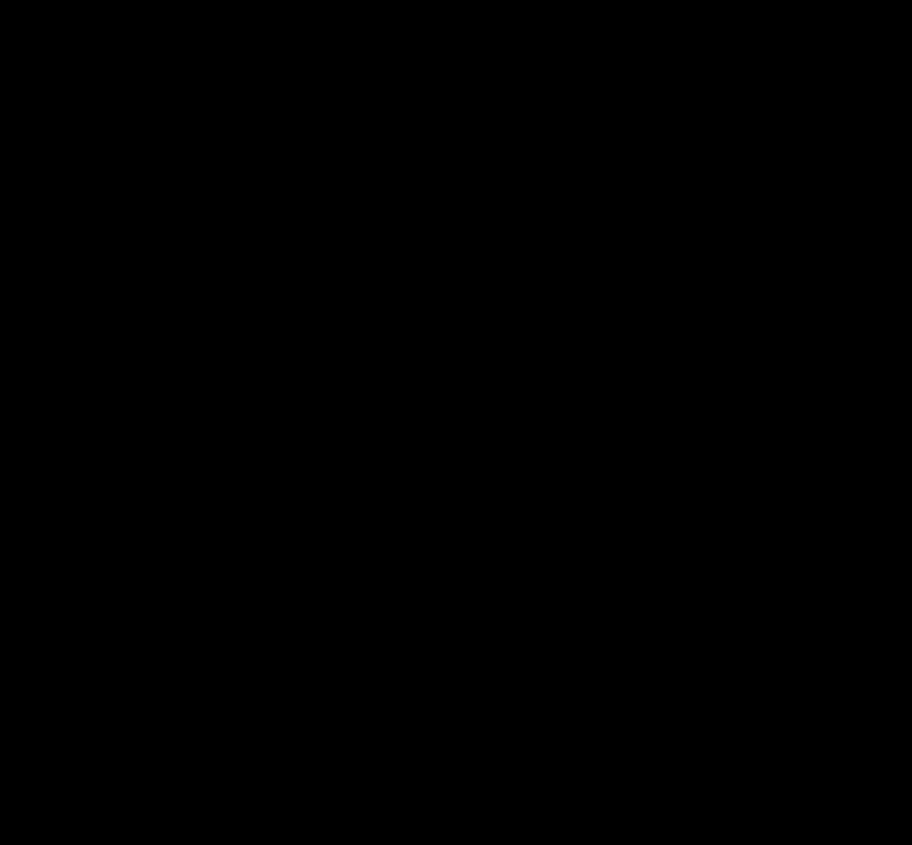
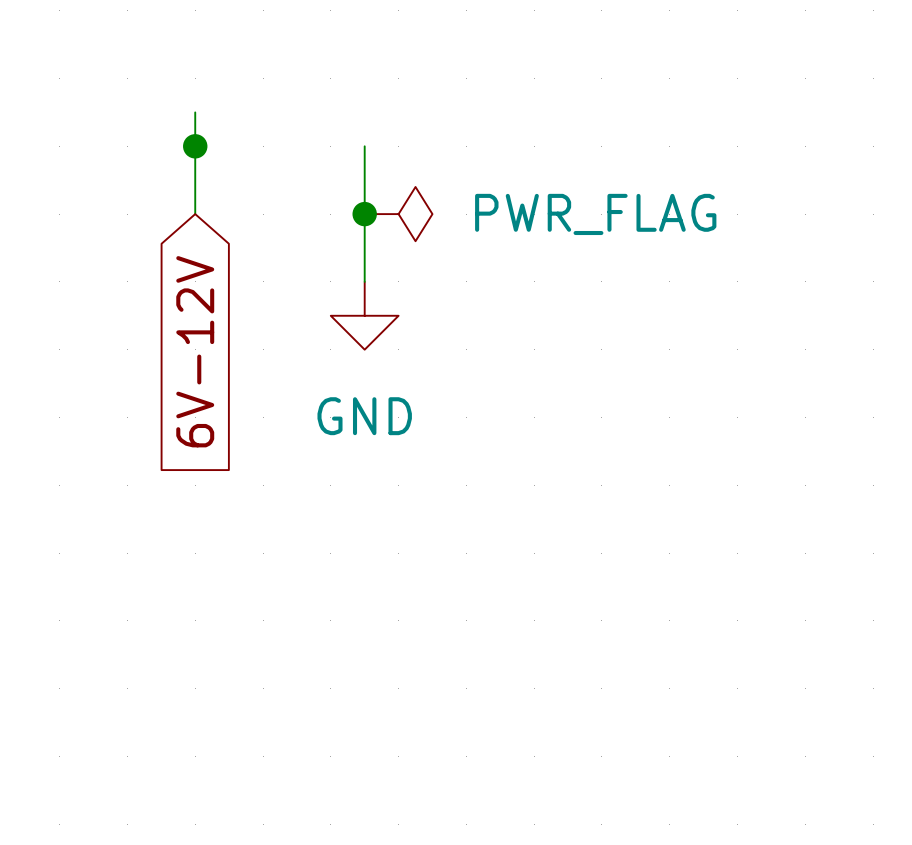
wire: none -> (195, 112) (195, 214)
junction: none -> (195, 146)
wire: none -> (364, 146) (364, 281)
junction: none -> (364, 214)
power symbol: none -> PWR_FLAG (398, 214)
power symbol: none -> GND (364, 315)
global label: none -> 6V-12V (195, 351)

